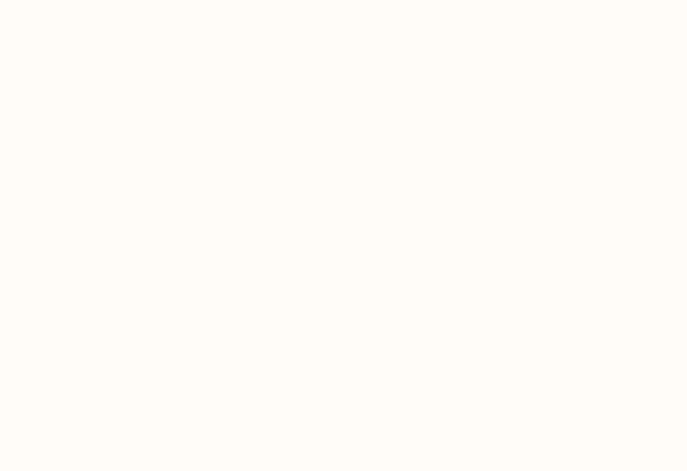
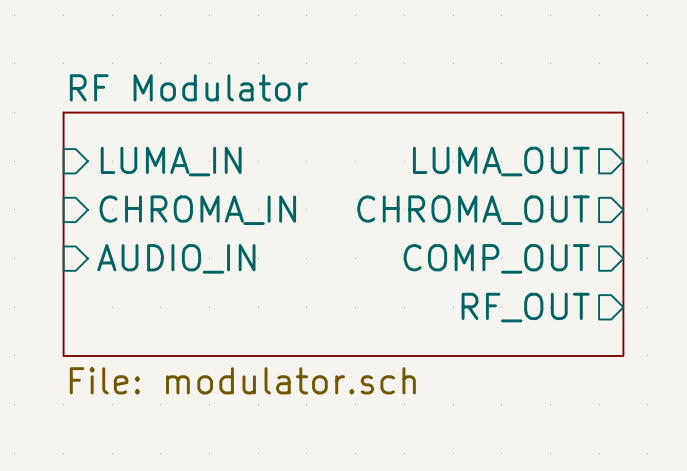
sheet pin: none -> LUMA_IN (171, 161)
sheet pin: none -> LUMA_OUT (501, 161)
sheet pin: none -> CHROMA_IN (197, 210)
sheet pin: none -> CHROMA_OUT (473, 210)
sheet RF Modulator: none -> File: modulator.sch (343, 234)
sheet pin: none -> AUDIO_IN (176, 258)
sheet pin: none -> COMP_OUT (496, 258)
sheet pin: none -> RF_OUT (525, 307)

